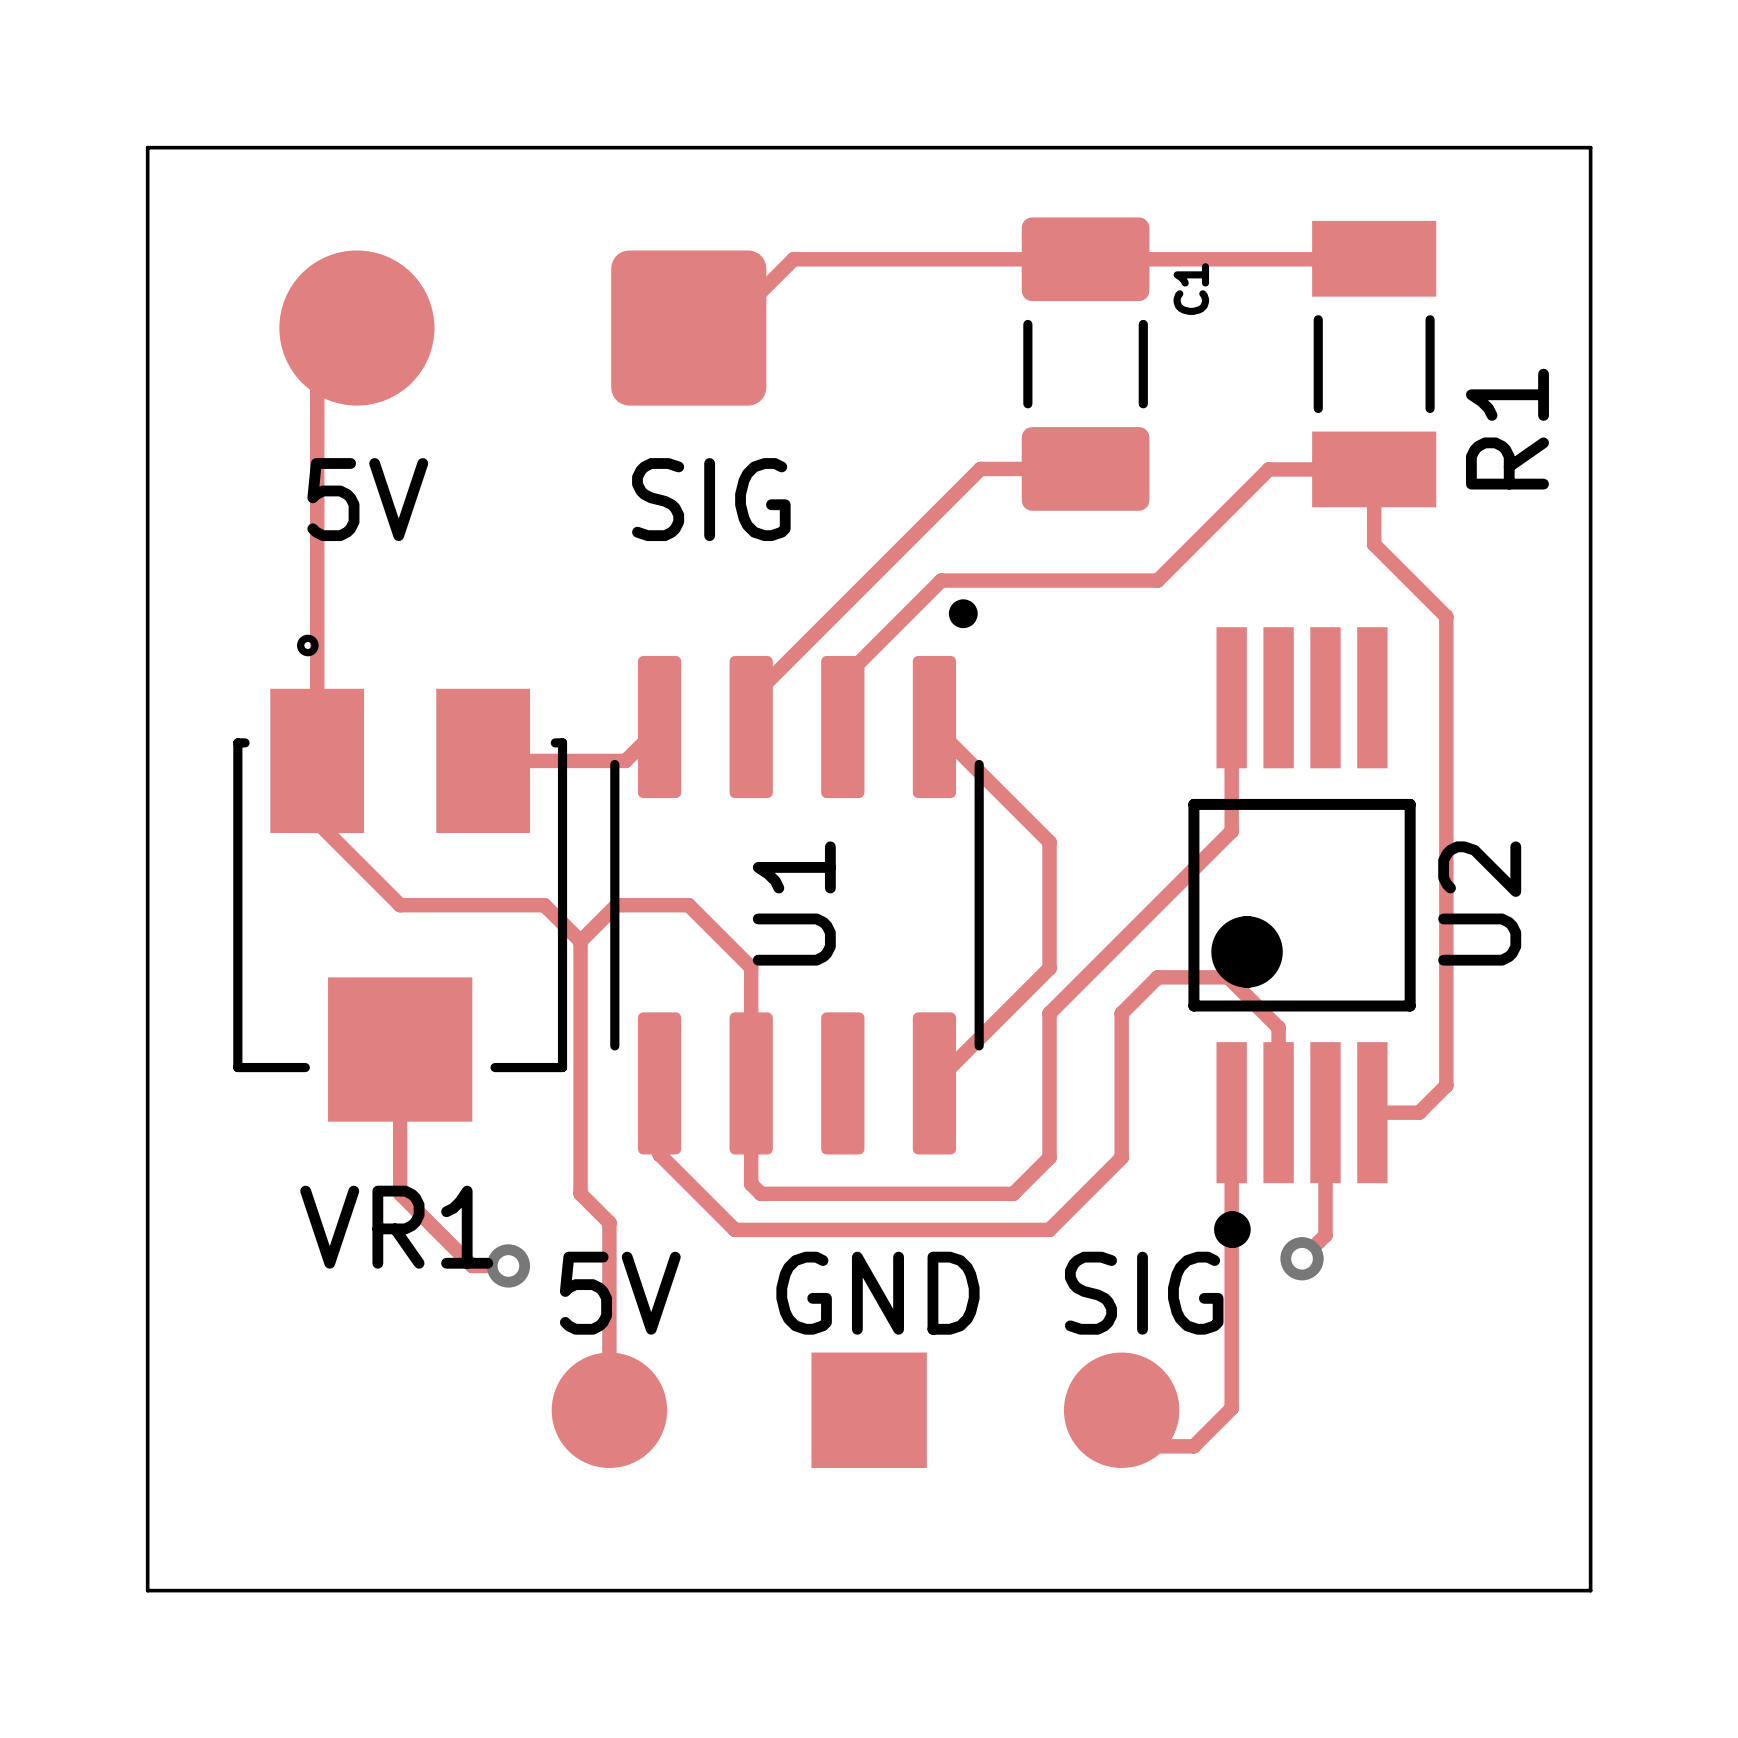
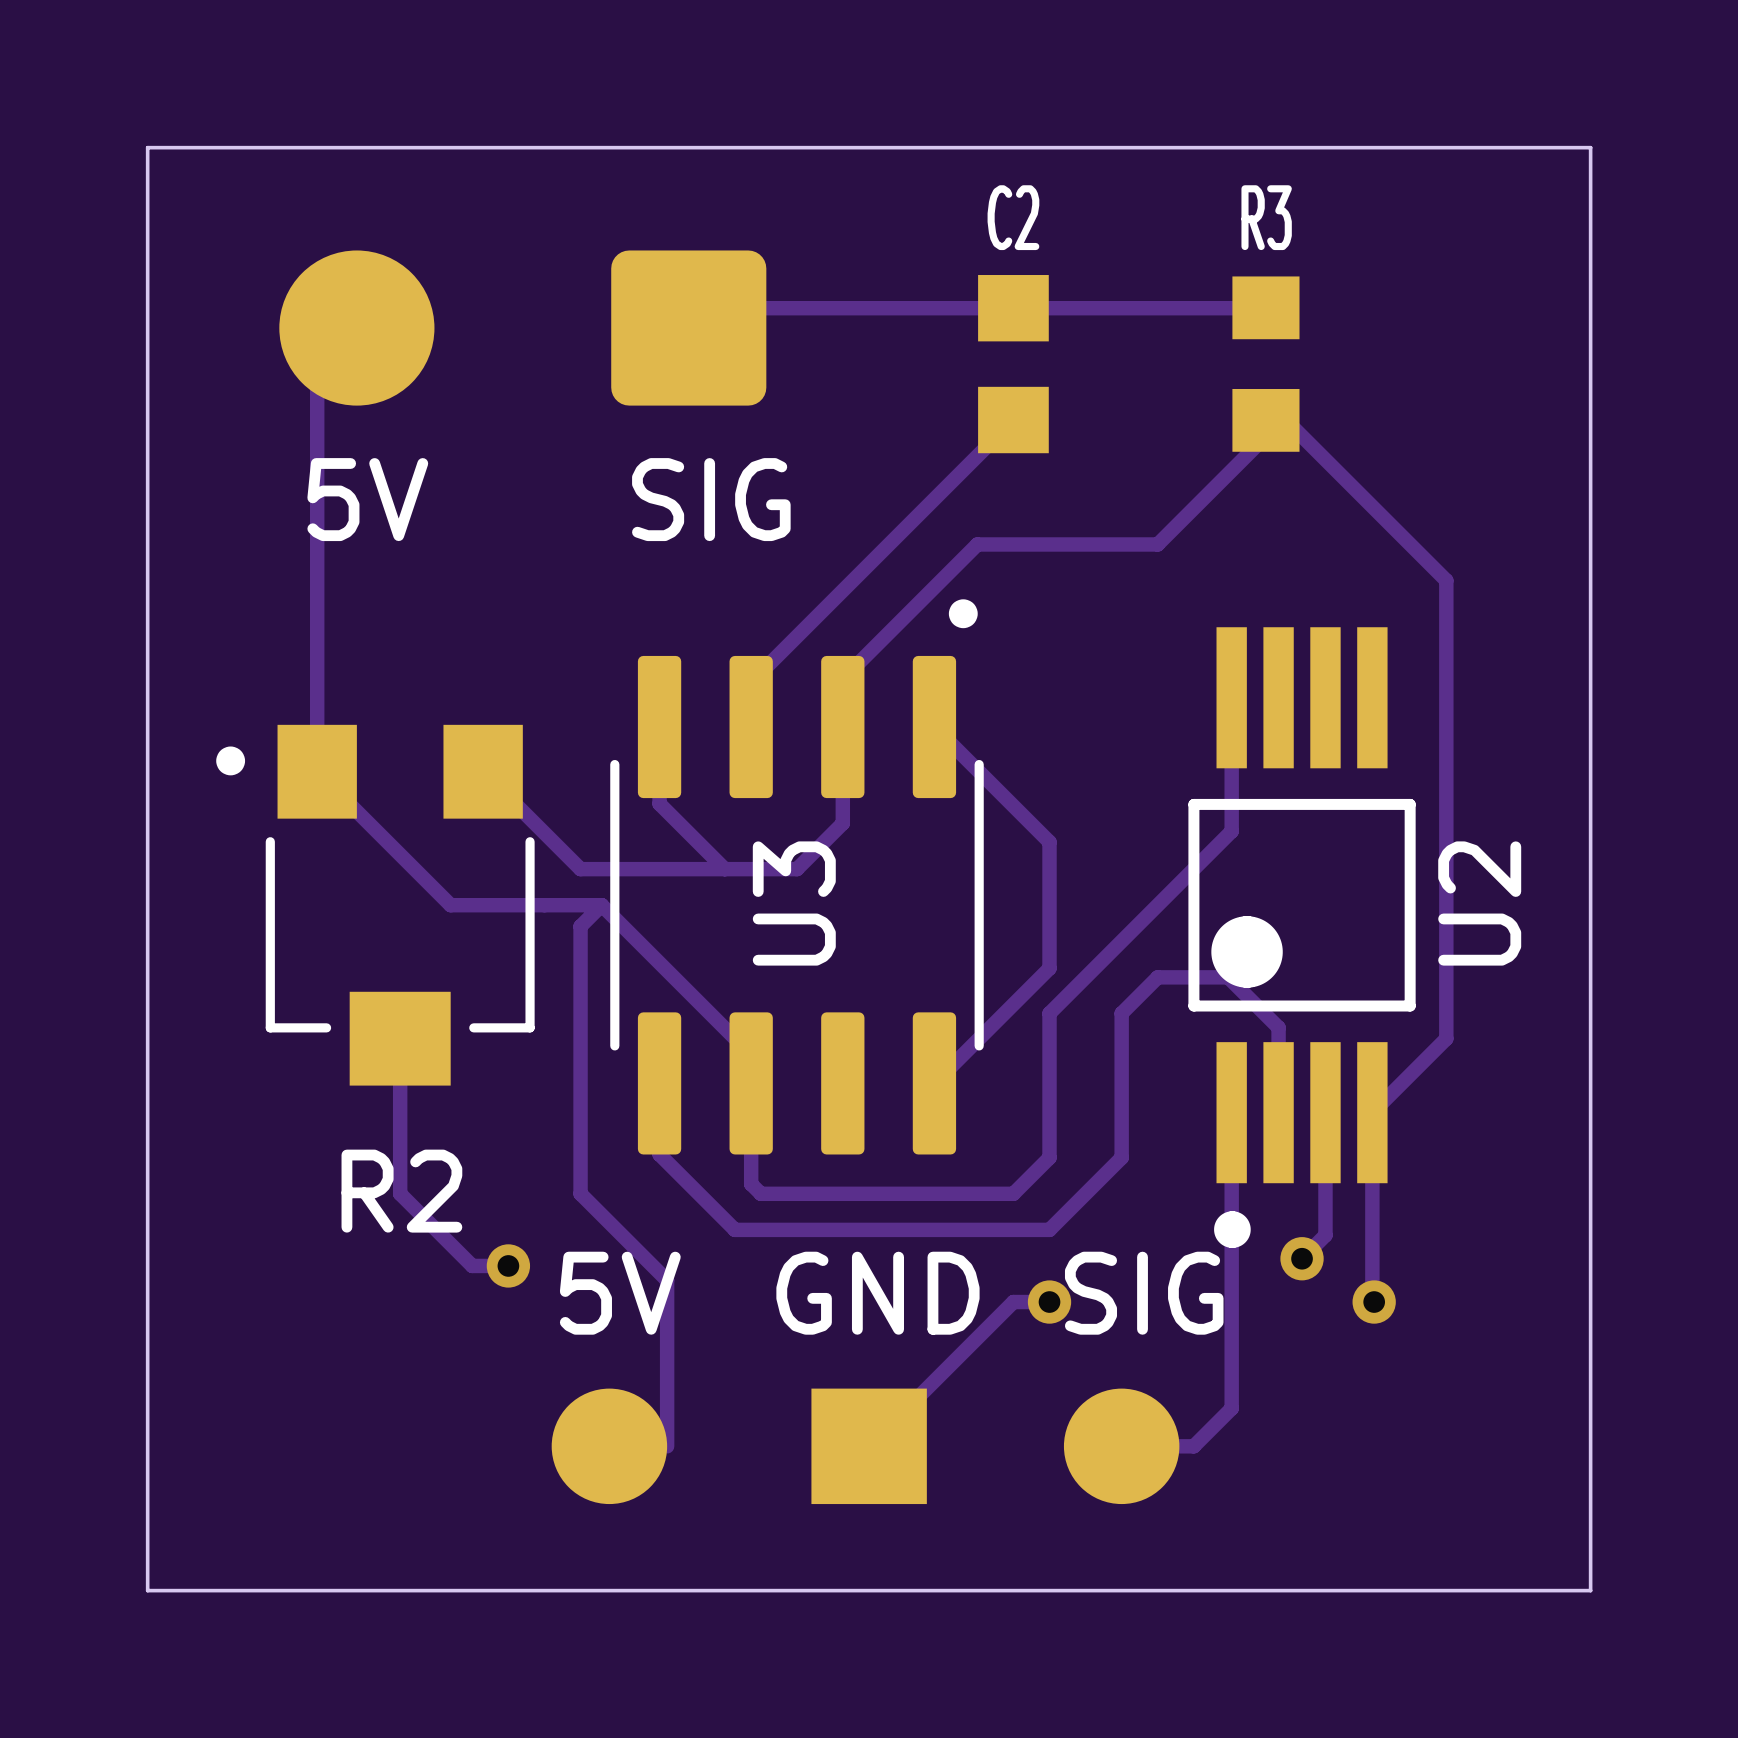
track: (1373, 259) (793, 259) (744, 308) -> (1265, 308) (744, 308)
C2: none -> (1013, 364)
C1: (1085, 364) -> none
R3: none -> (1265, 364)
R1: (1374, 364) -> none
track: none -> (1013, 420) (751, 682)
track: (1085, 468) (980, 468) (751, 698) -> none
track: (941, 580) (1157, 580) (1268, 469) (1374, 469) (1374, 544) (1446, 616) -> (941, 580) (977, 544) (1157, 544) (1265, 436) (1265, 420) (1286, 420) (1446, 580) (1446, 616)
track: (659, 727) (625, 760) (483, 760) -> (659, 727) (659, 803) (724, 869)
track: none -> (842, 727) (842, 823) (796, 869) (580, 869) (483, 771)
track: (317, 771) (317, 822) (400, 905) (450, 905) -> (317, 771) (450, 905)
VR1: (400, 878) -> none
U1 name: U1 (794, 903) -> U3 (794, 903)
R2: none -> (375, 905)
track: (544, 905) (580, 941) (616, 905) (688, 905) (751, 967) (751, 1054) -> (601, 905) (751, 1054)
track: none -> (544, 905) (601, 905)
track: none -> (601, 905) (580, 926) (580, 941)
track: (1446, 1038) (1446, 1085) (1419, 1112) (1372, 1112) -> (1446, 1038) (1372, 1112) (1372, 1300) (1374, 1302)
track: (609, 1222) (609, 1410) -> (609, 1222) (667, 1280) (667, 1446)
track: none -> (1049, 1302) (1013, 1302) (869, 1446)
via: none -> (1049, 1302)
via: none -> (1374, 1302)
part position: (739, 1410) -> (739, 1446)
part position: (1121, 1410) -> (1121, 1446)

